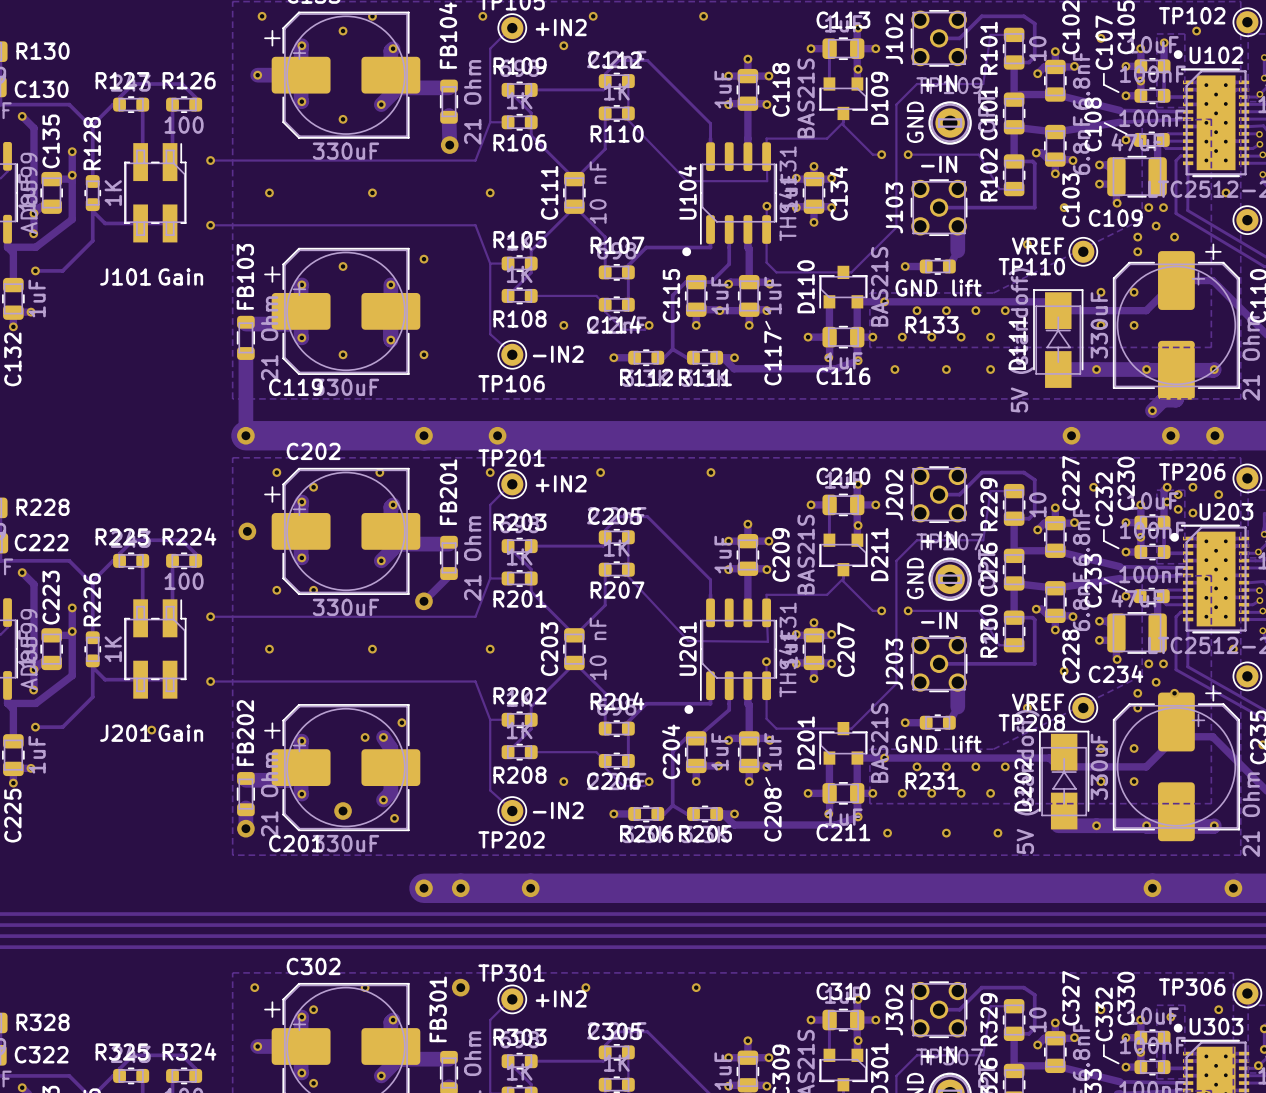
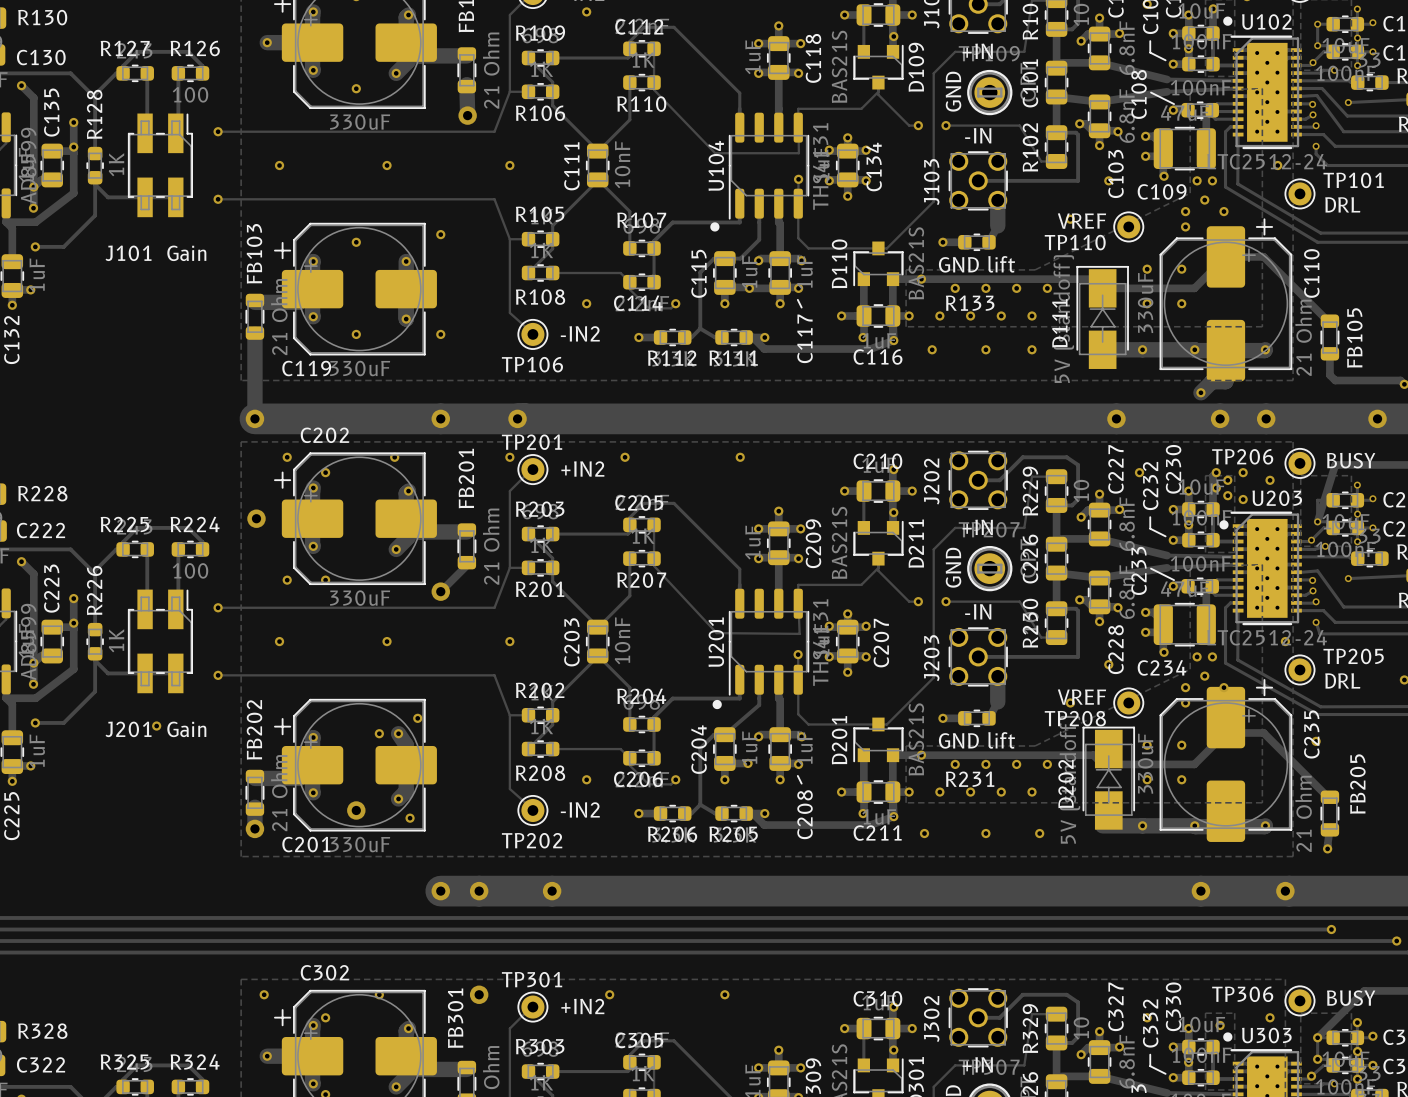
C111 value: 10 nF (598, 192) -> 10nF (622, 164)
C203 value: 10 nF (598, 648) -> 10nF (622, 640)

